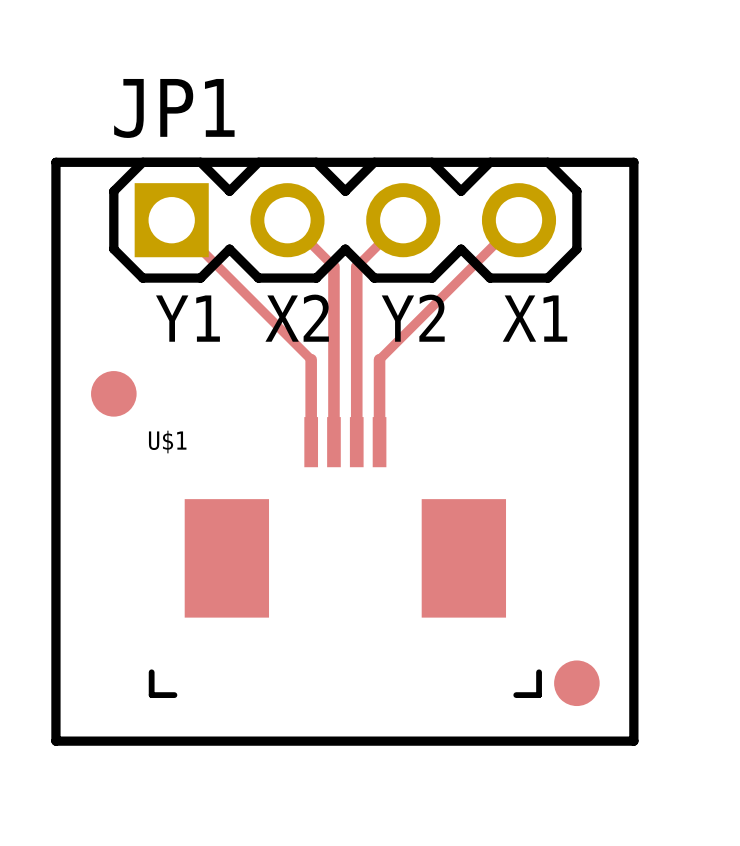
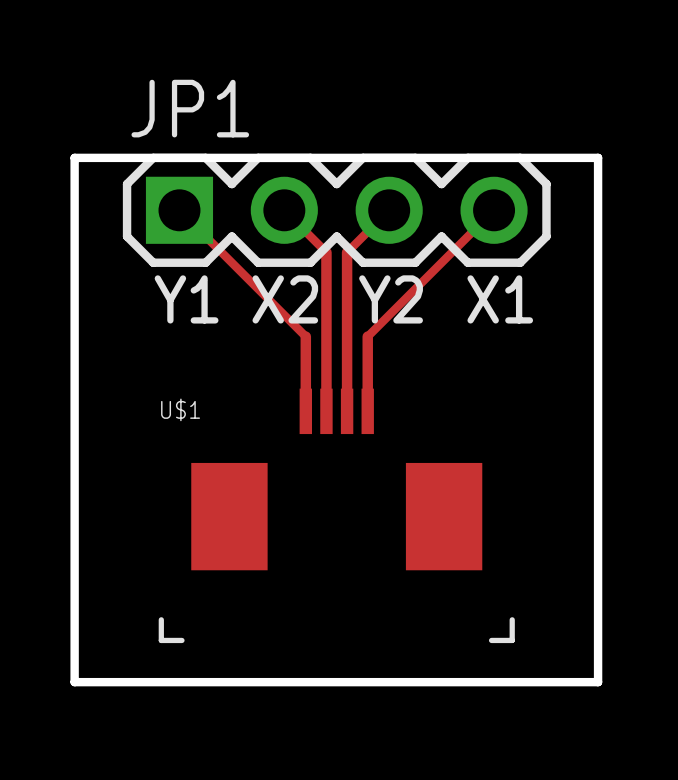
part: (113, 393) -> none
part: (576, 683) -> none

